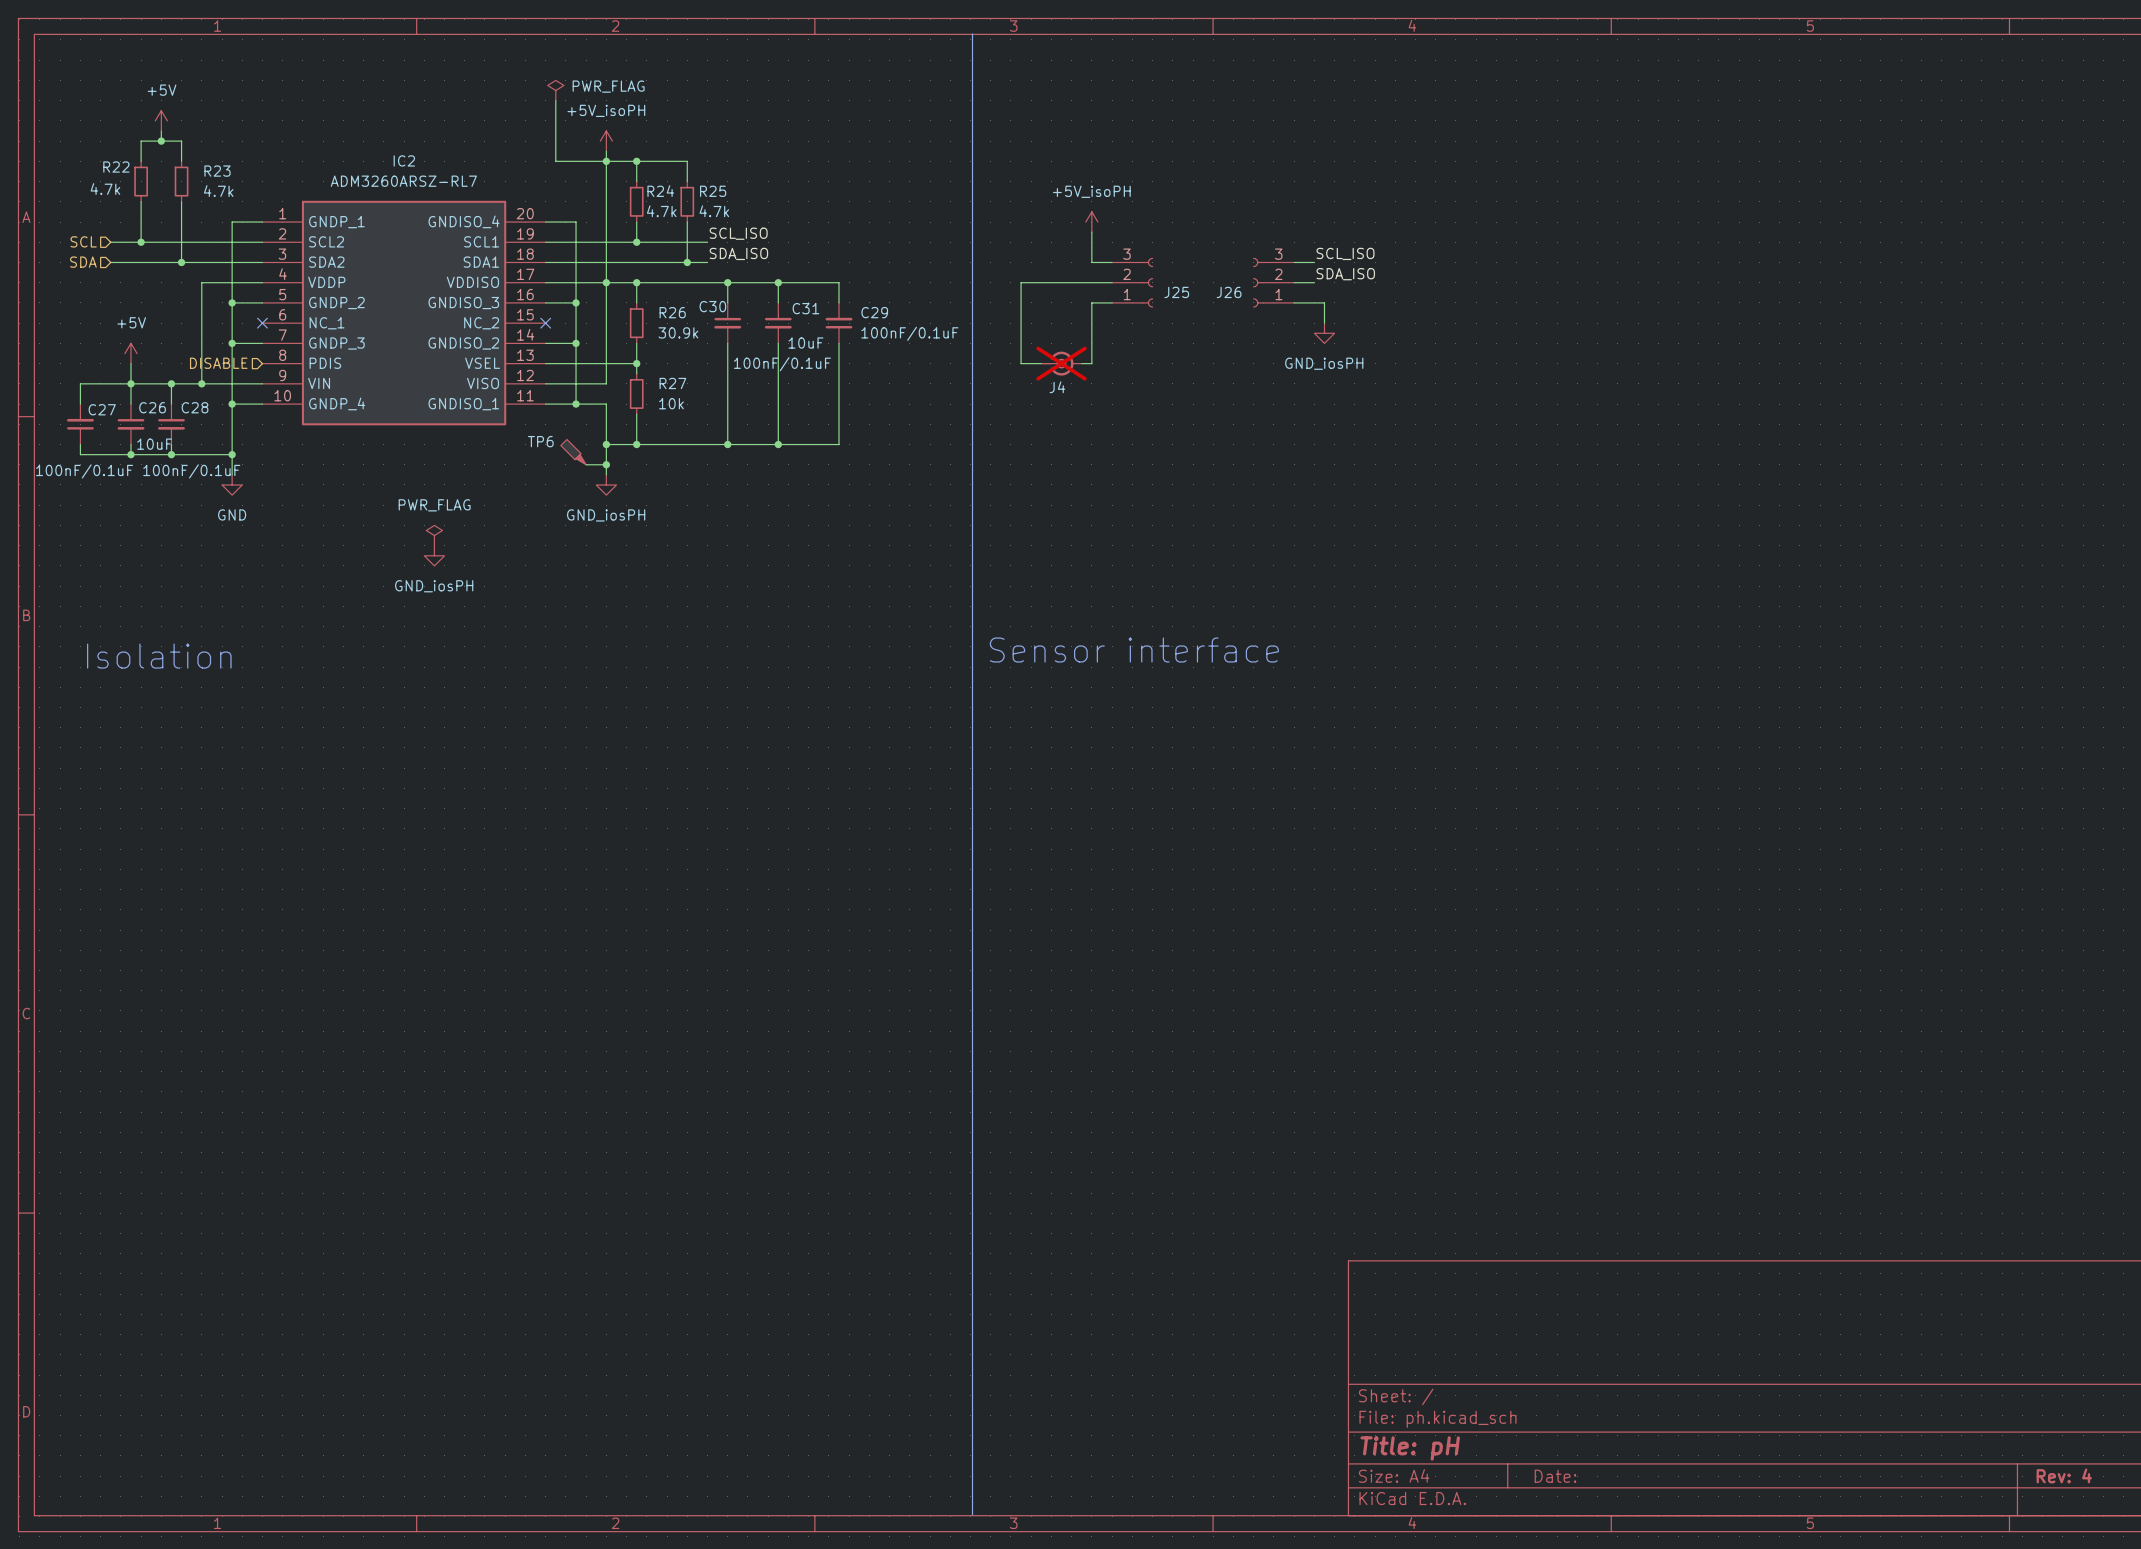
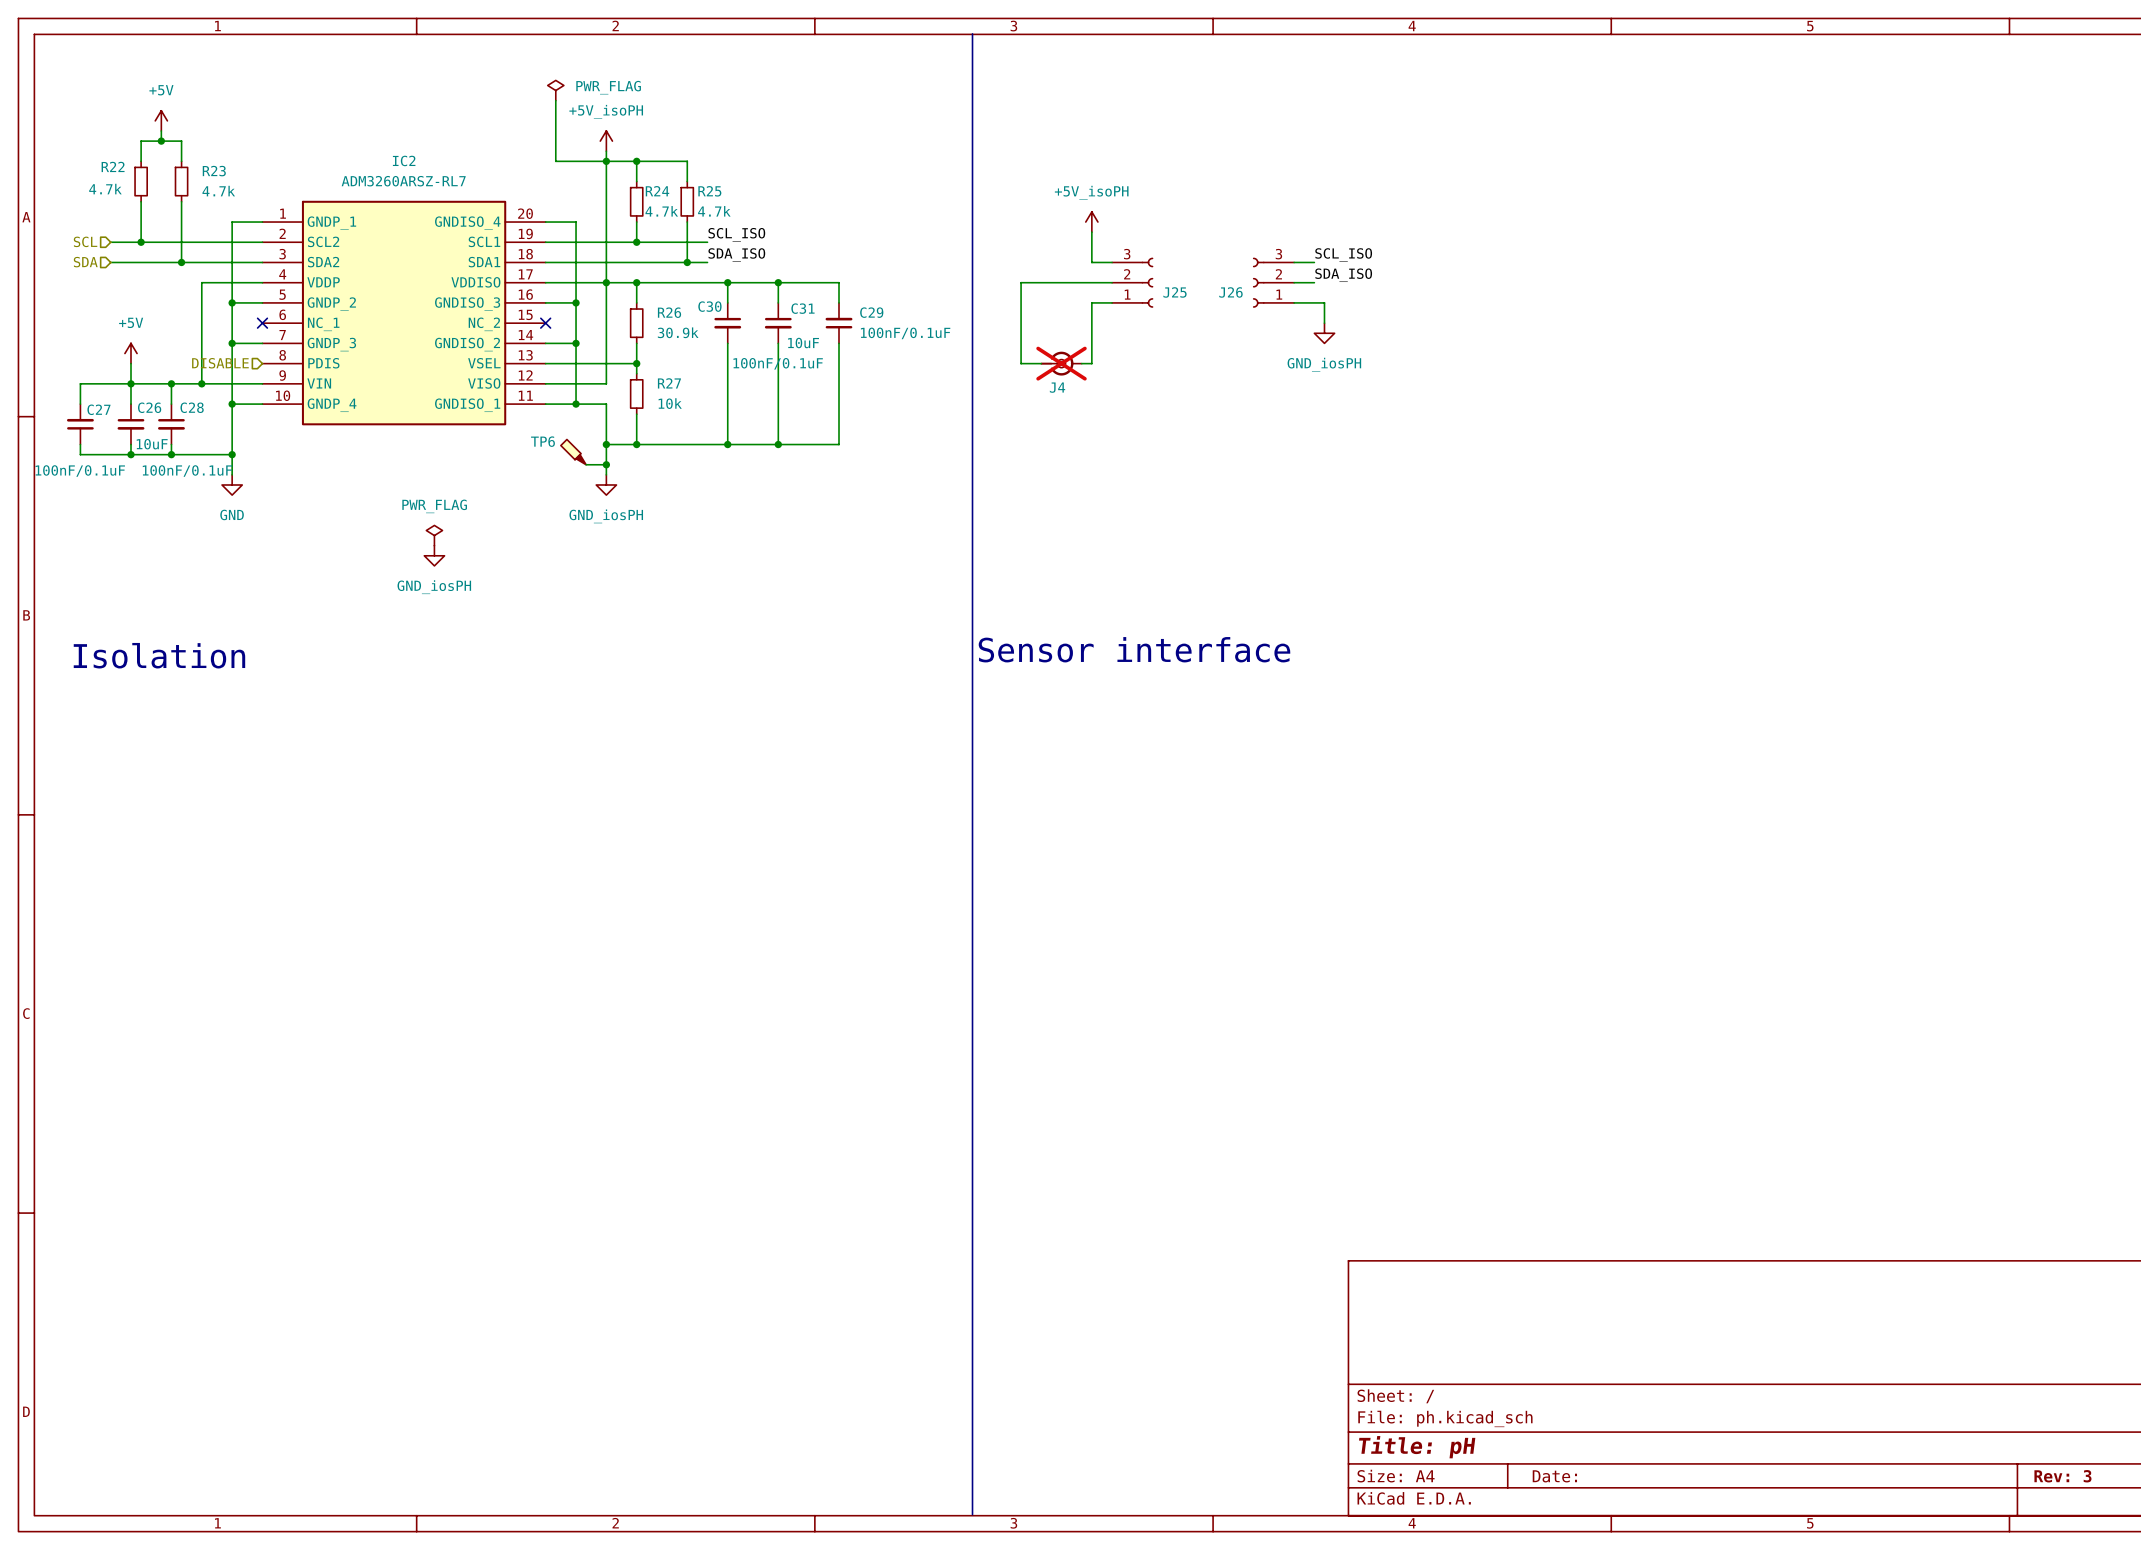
title block: Rev: 4 (2064, 1475) -> Rev: 3 (2062, 1476)

